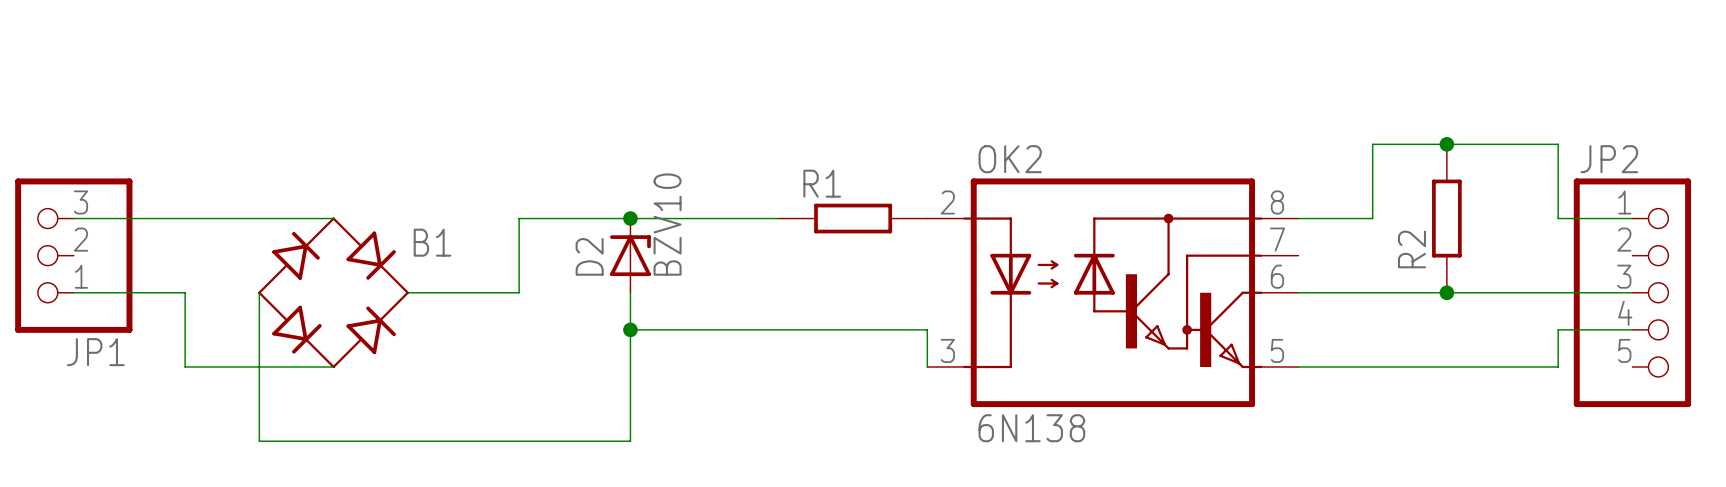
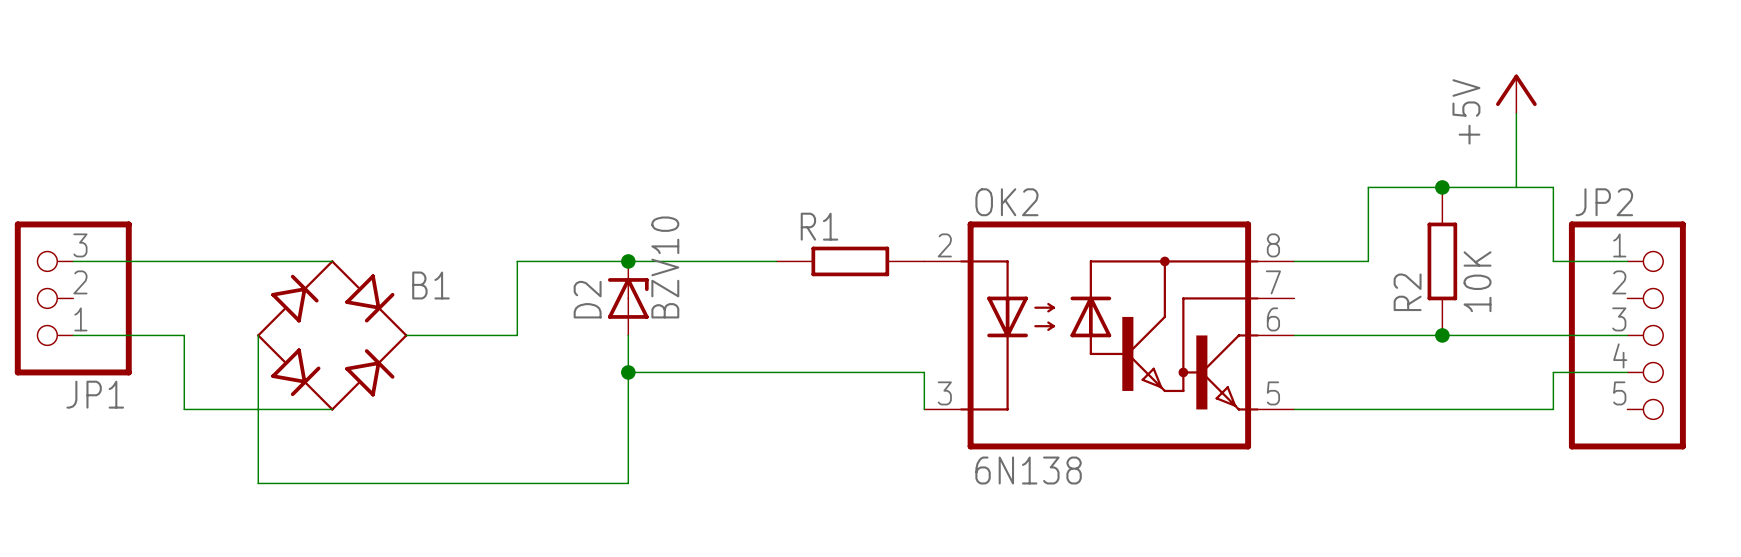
power symbol: none -> +5V (1516, 94)
wire: none -> (1516, 113) (1516, 187)
R2 value: none -> 10K (1477, 281)

